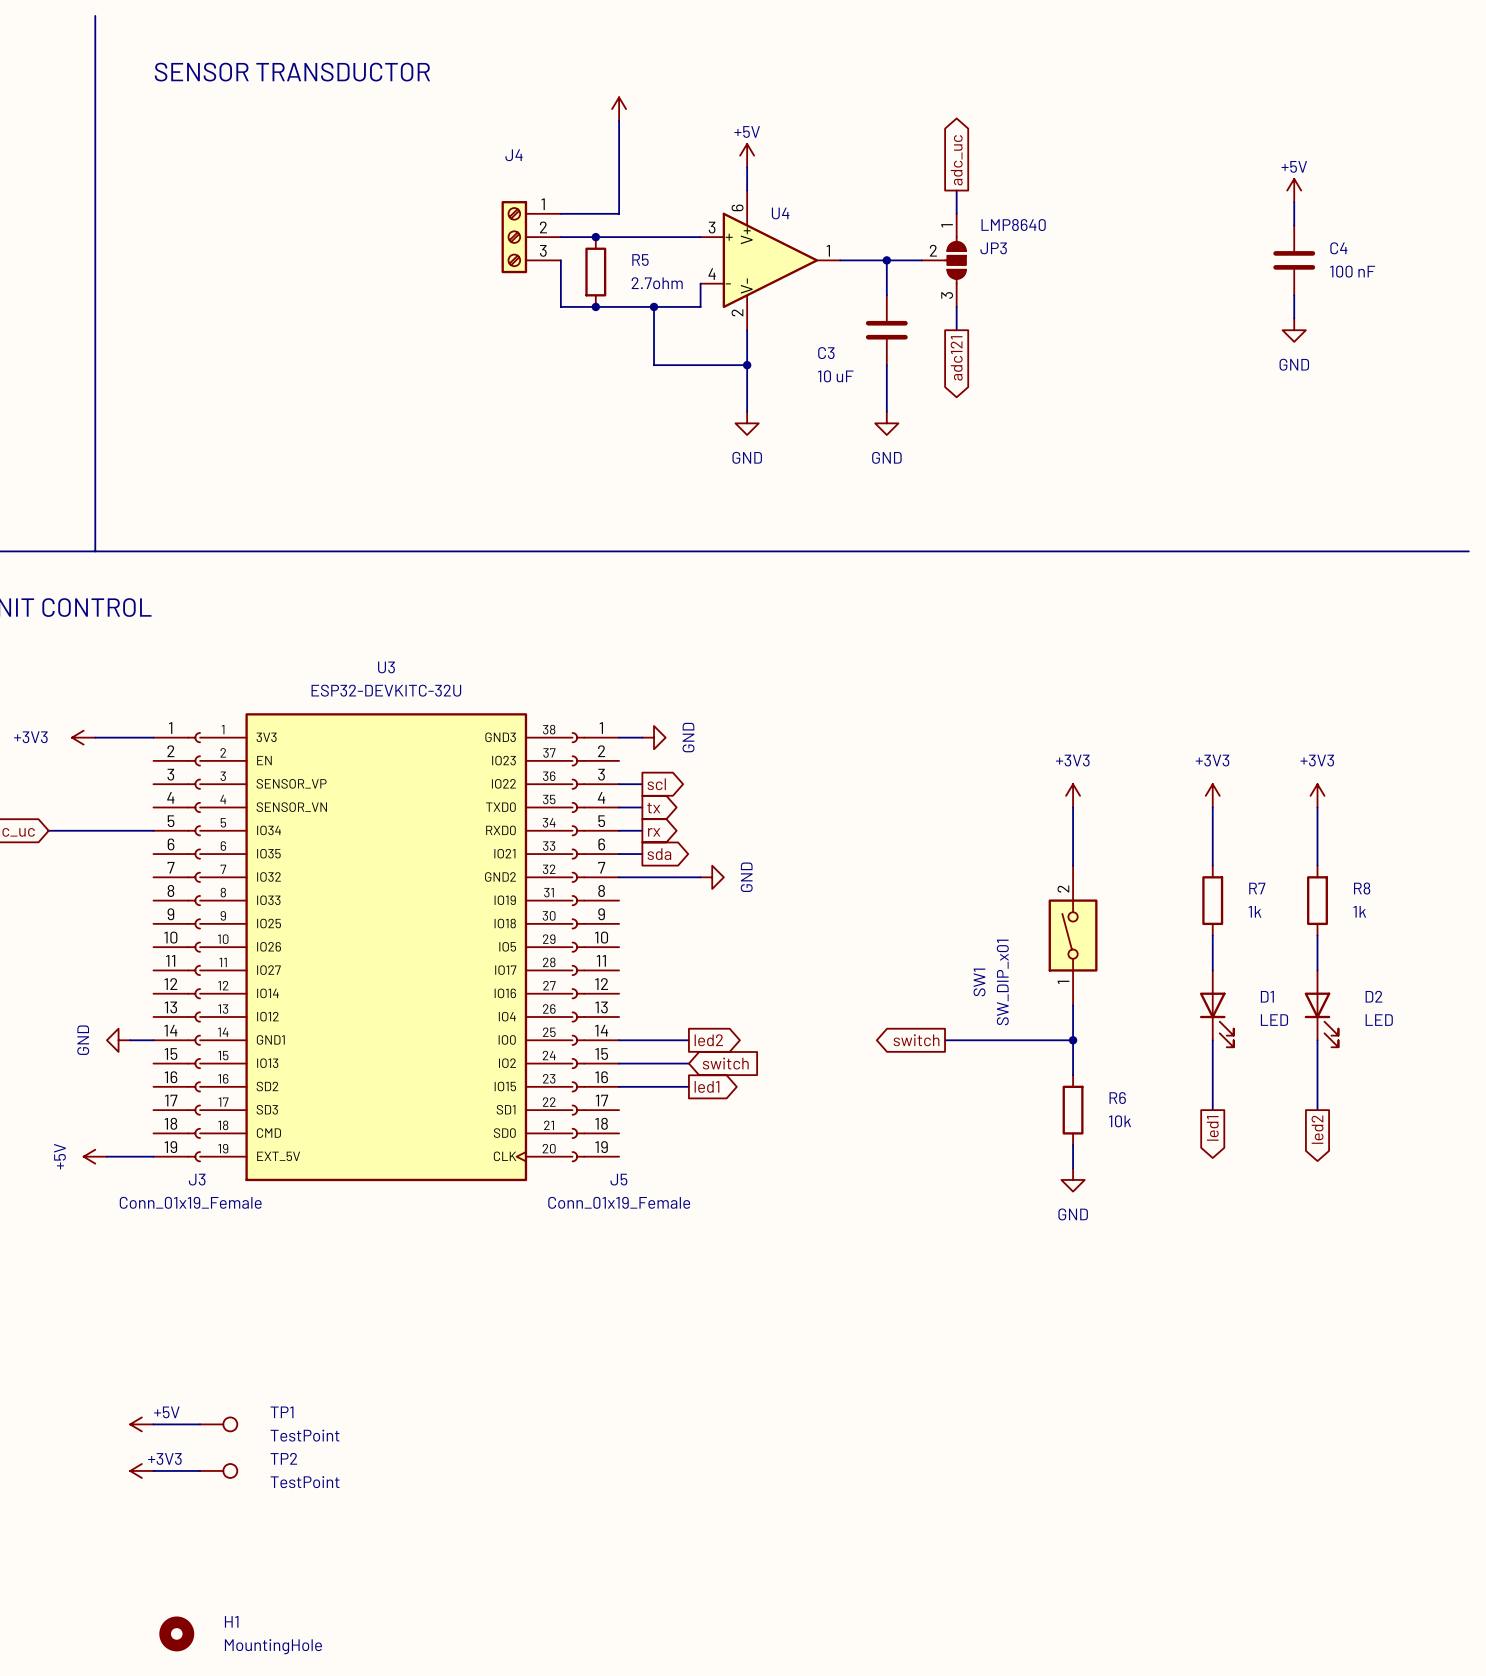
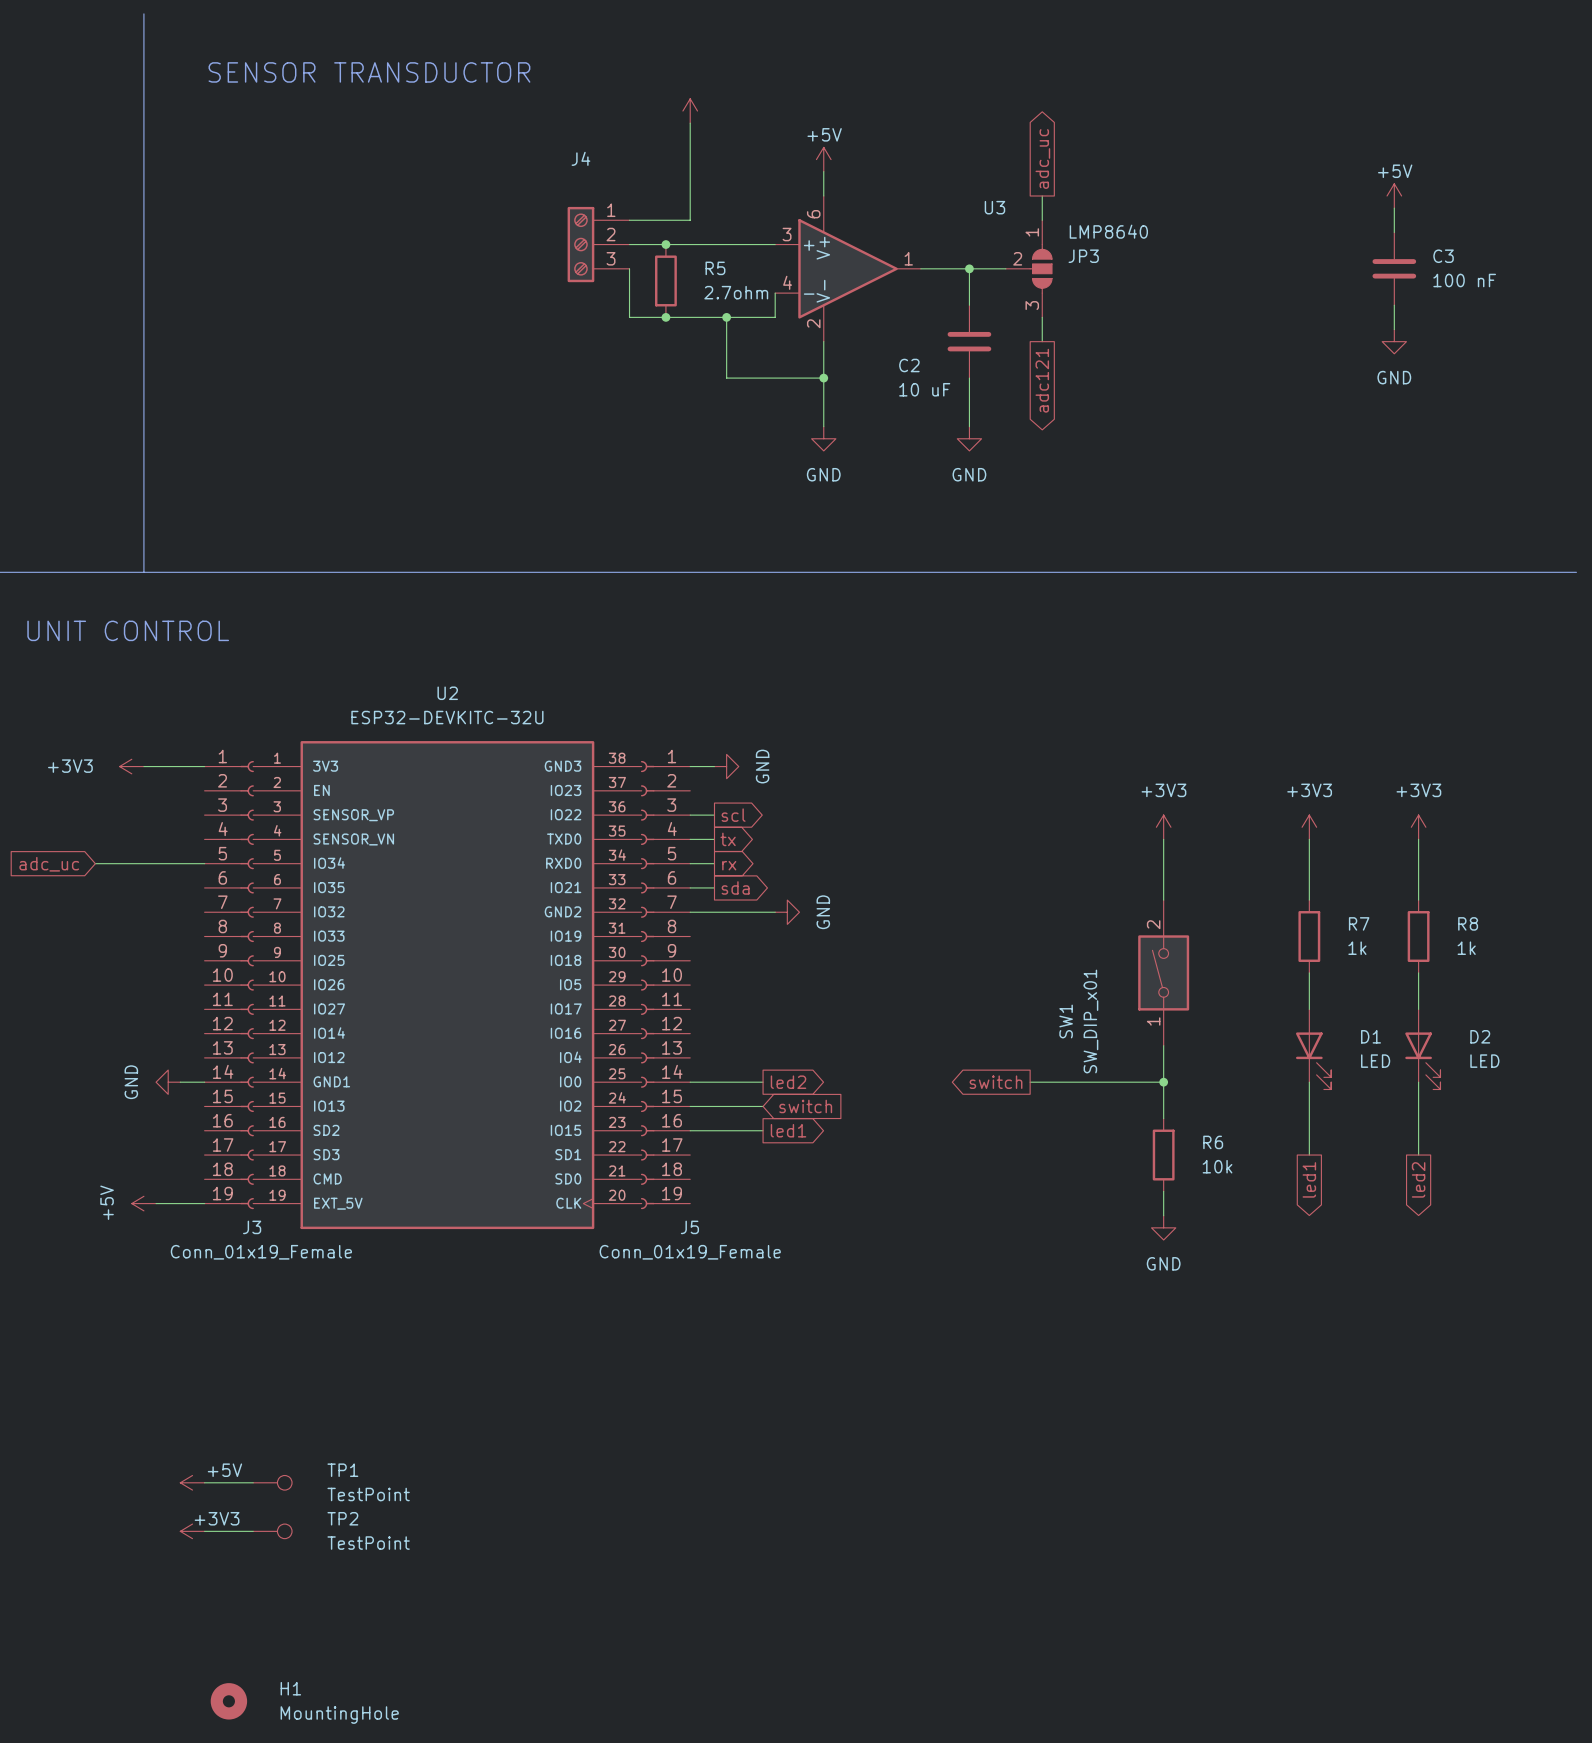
U4 name: U4 (780, 213) -> U3 (994, 207)
C4 name: C4 (1338, 248) -> C3 (1443, 256)
C3 name: C3 (826, 353) -> C2 (909, 365)
U3 name: U3 (386, 667) -> U2 (447, 693)

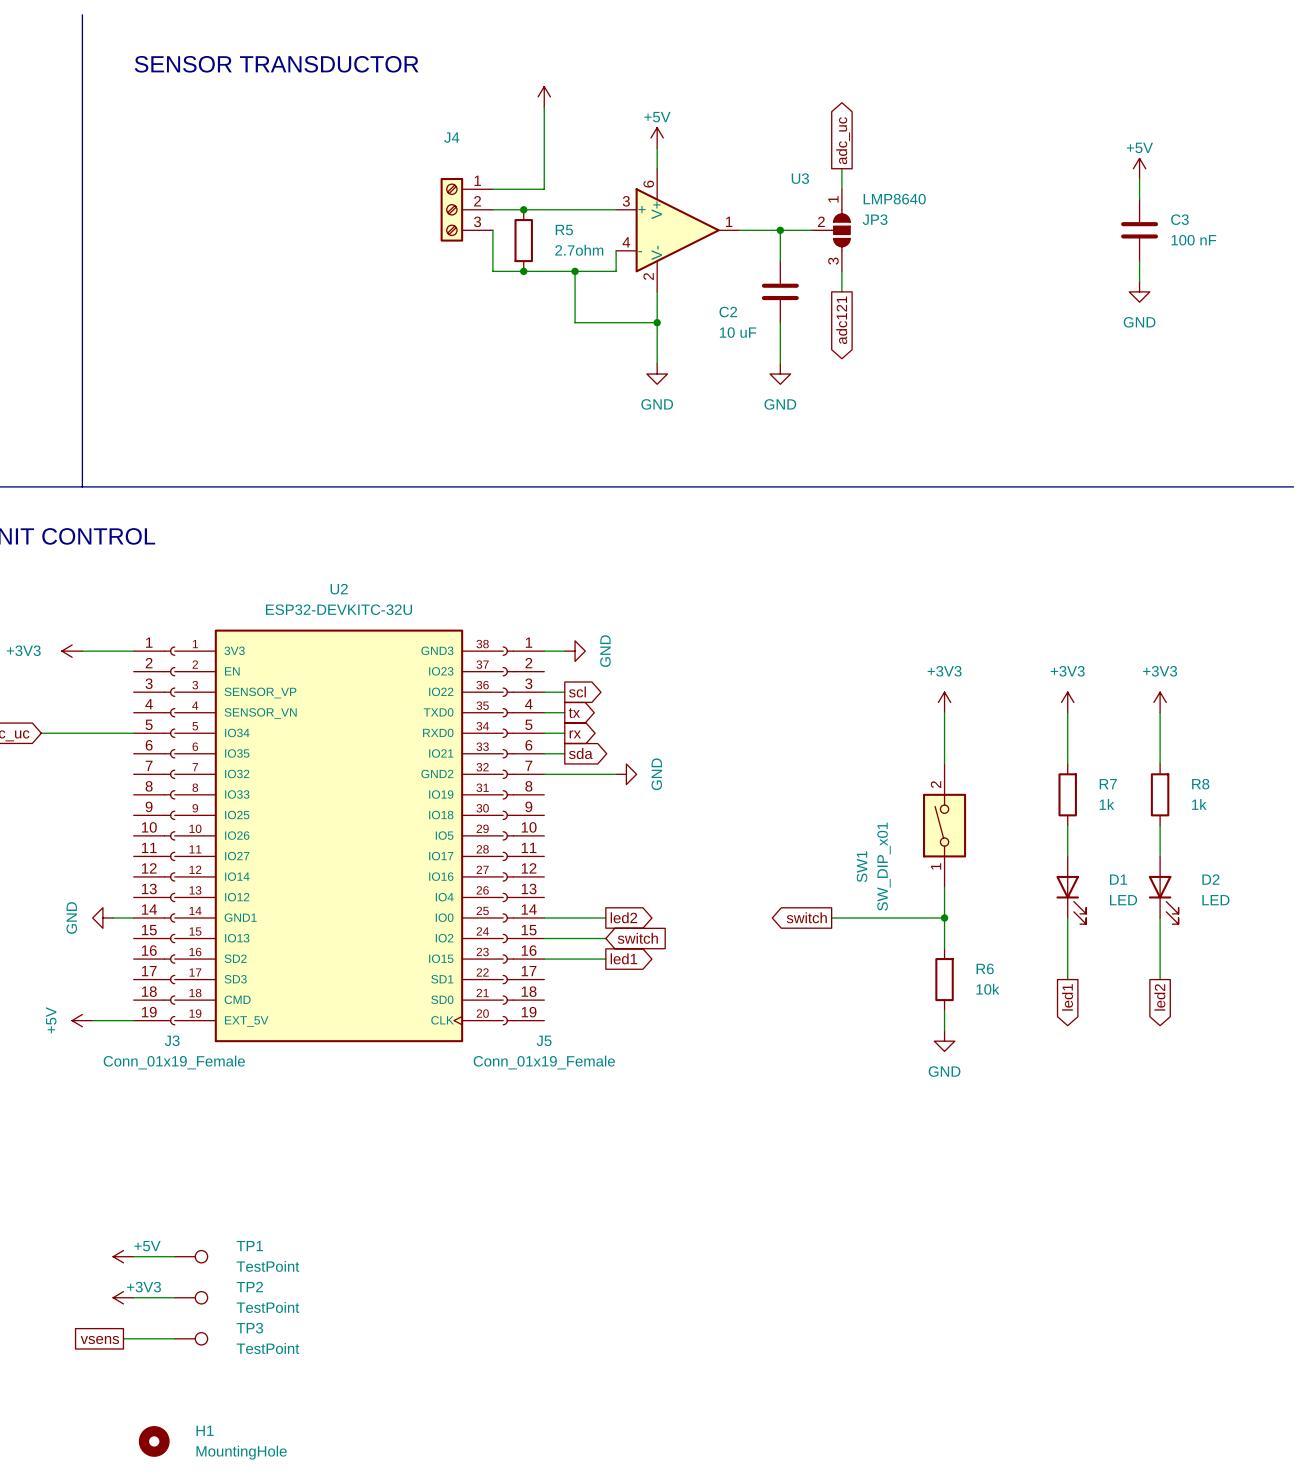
wire: none -> (123, 1338) (174, 1338)
TP3: none -> TestPoint (191, 1338)
global label: none -> vsens (99, 1340)

